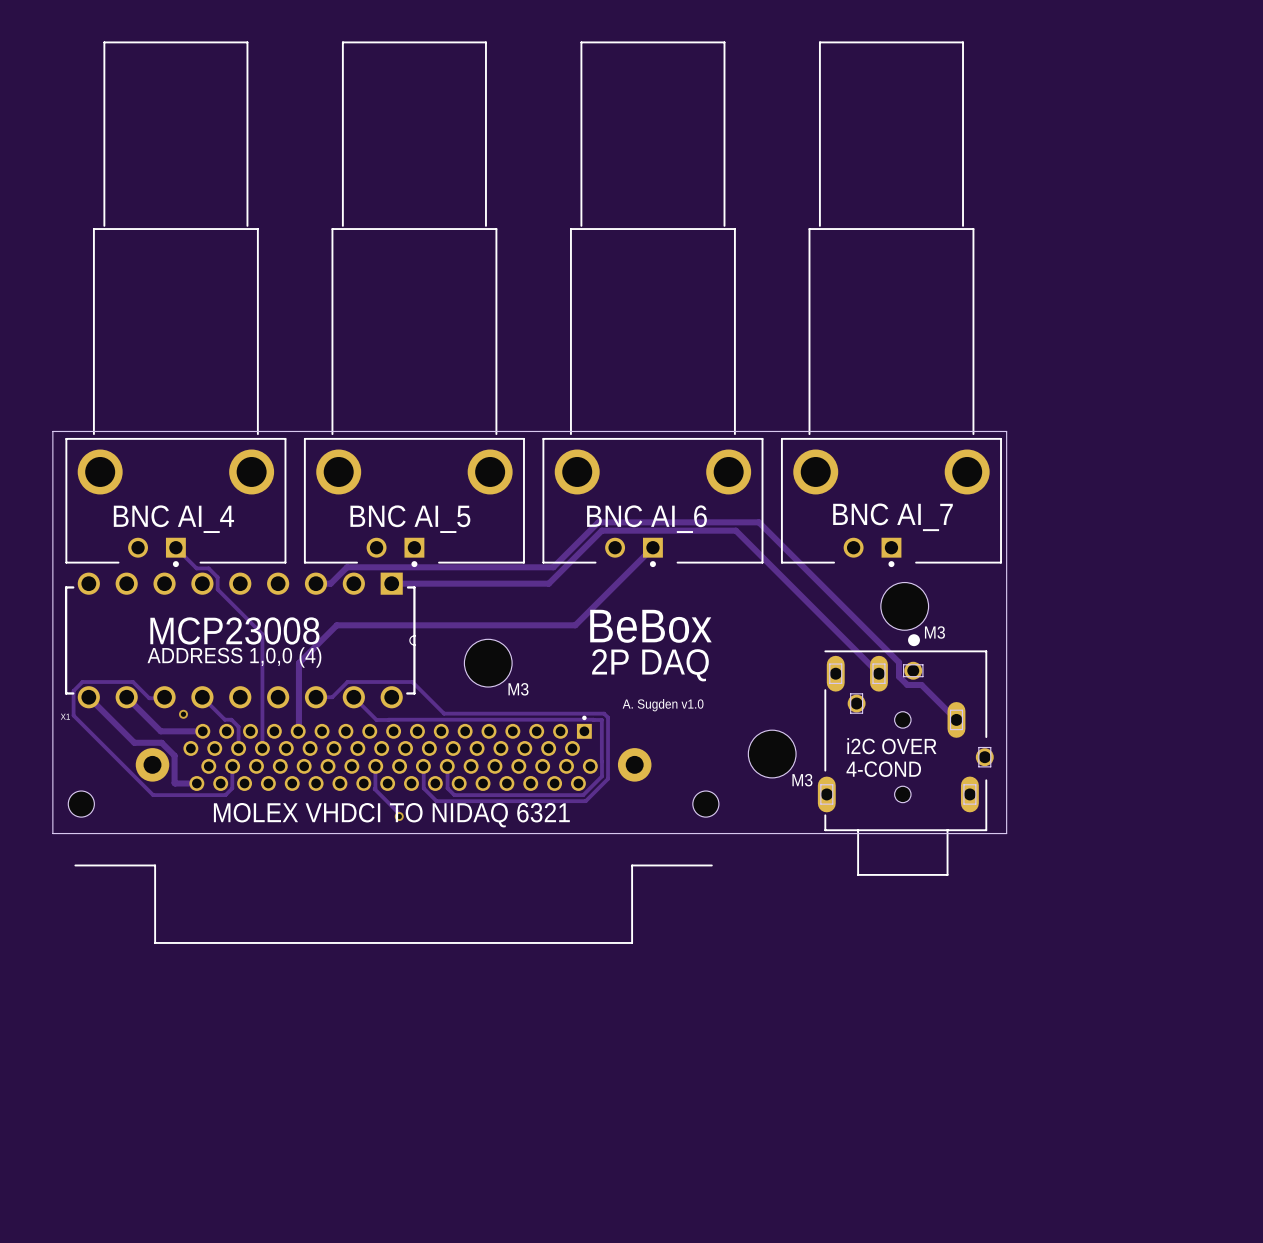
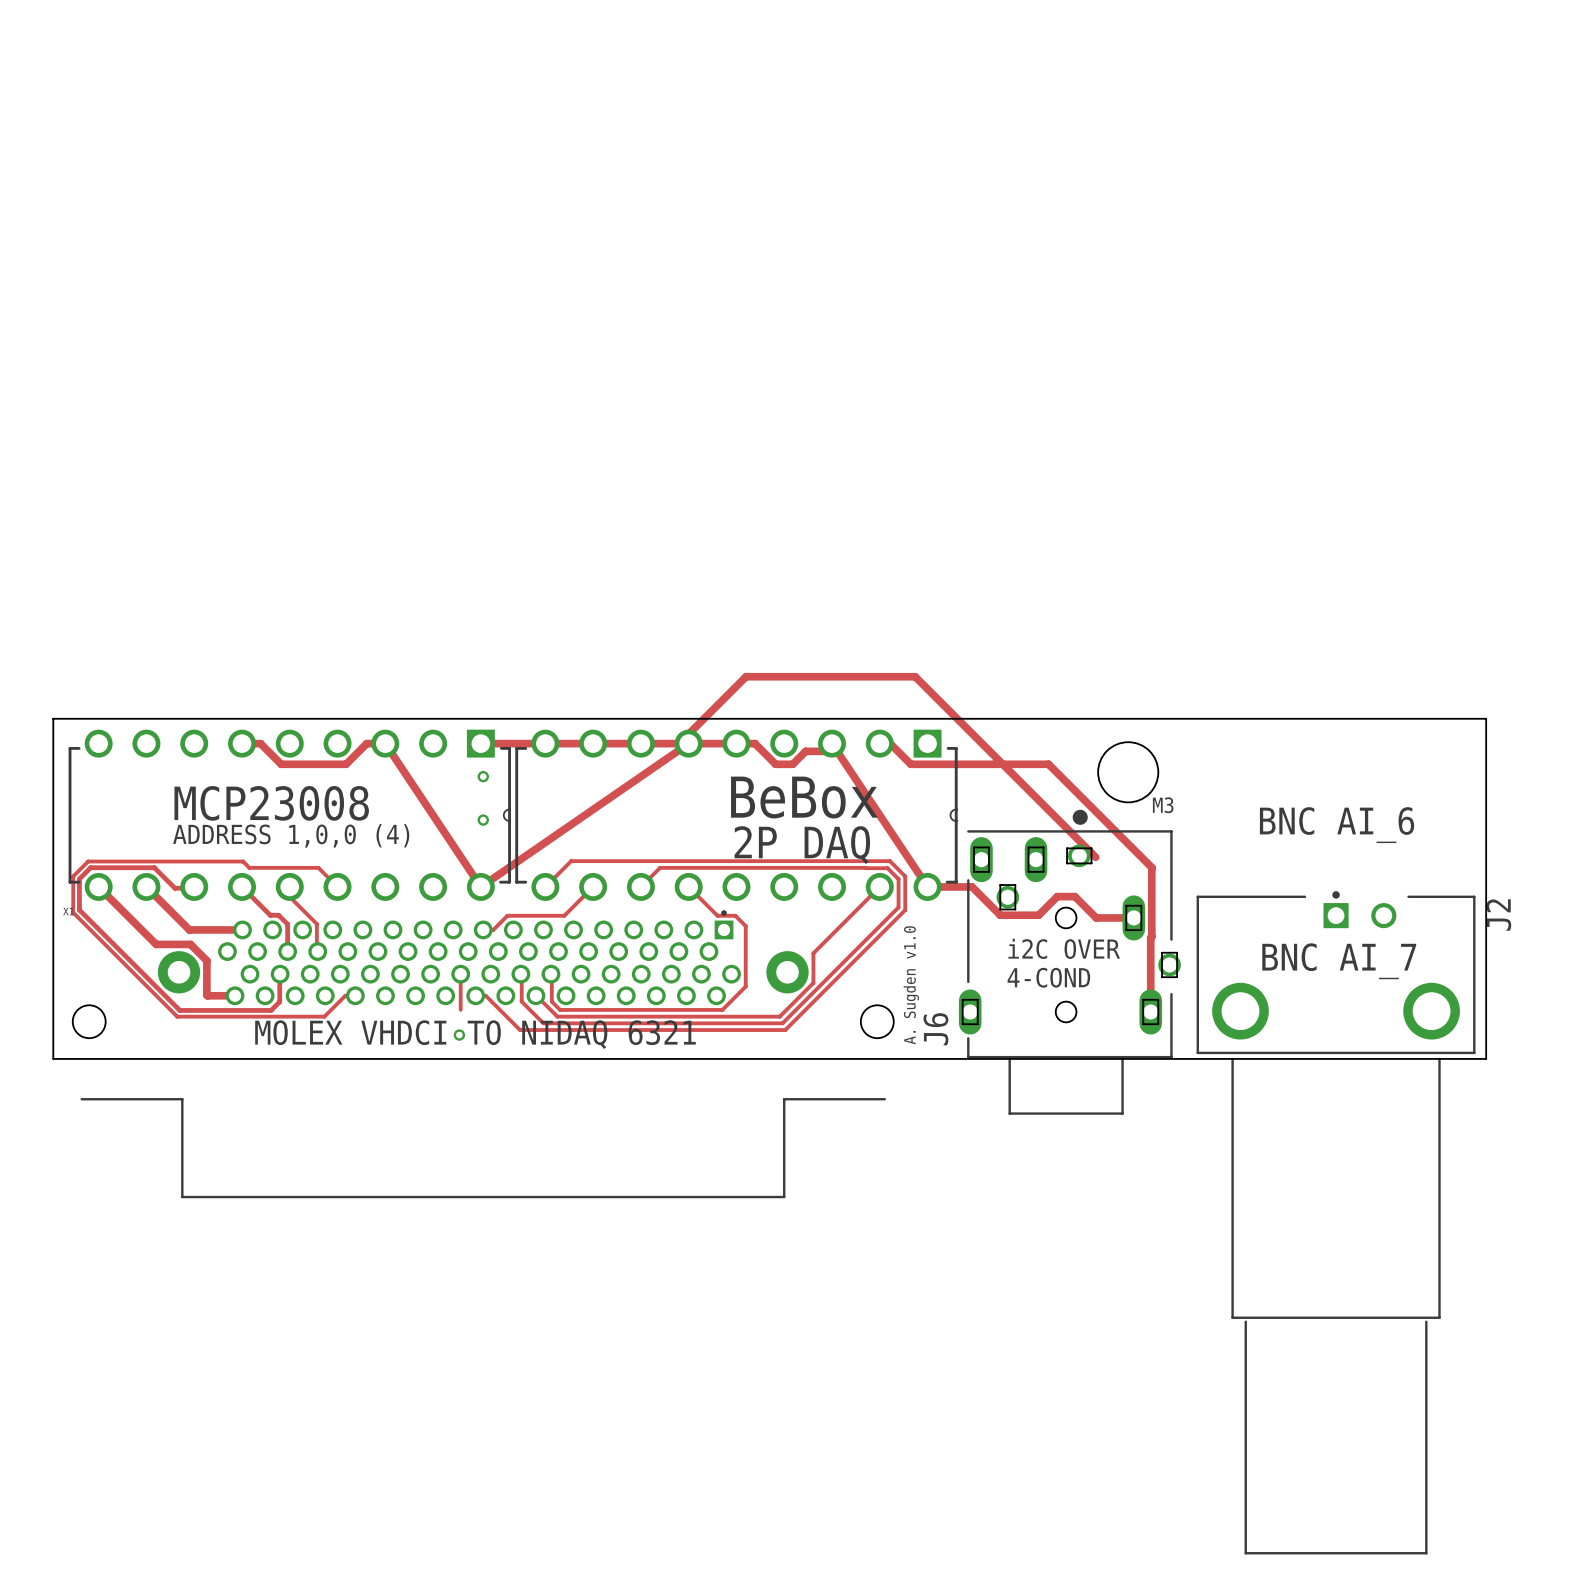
part: (175, 304) -> none
part: (414, 304) -> none
part: (652, 304) -> none
part: (891, 304) -> none
text position: BNC AI_7 (892, 517) -> BNC AI_7 (1339, 961)
text: BNC AI_4 (173, 519) -> none
text: BNC AI_5 (410, 519) -> none
text: BNC AI_6 (646, 519) -> none
track: (175, 547) (196, 568) (208, 568) (217, 577) (217, 589) (262, 634) (262, 748) -> (289, 886) (289, 896) (316, 924) (317, 951)
track: (652, 547) (575, 625) (336, 625) (298, 663) (298, 731) -> none
board edge: (52, 563) (52, 431) (1006, 431) (1006, 833) -> (53, 718) (1486, 718) (1486, 1058) (1256, 1058)
track: none -> (242, 743) (260, 743) (281, 764) (346, 764) (366, 743) (385, 743) (480, 886) (688, 743) (755, 743) (775, 764) (792, 764) (805, 751) (837, 751)
track: (315, 583) (330, 583) (347, 567) (553, 567) (598, 522) (758, 522) (899, 662) (899, 676) (907, 684) (921, 684) (956, 719) -> none
track: none -> (832, 743) (927, 886) (972, 886) (1000, 915) (1038, 915) (1057, 896) (1074, 896) (1096, 917) (1133, 917)
track: none -> (879, 743) (890, 743) (910, 764) (1048, 764) (1152, 867) (1150, 1011)
via: none -> (483, 776)
part: none -> (736, 815)
via: none -> (483, 820)
text: none -> BNC AI_6 (1337, 825)
hole: (488, 663) -> none
text: M3 (518, 689) -> none
track: none -> (337, 886) (318, 867) (249, 867) (243, 861) (88, 861) (73, 876) (73, 912) (177, 1016) (324, 1016) (345, 995) (355, 995)
track: (315, 697) (332, 697) (347, 682) (412, 682) (444, 713) (604, 713) (608, 717) (608, 778) (585, 801) (436, 801) (423, 788) (423, 766) -> (640, 886) (660, 867) (887, 868) (898, 879) (898, 907) (782, 1023) (543, 1023) (521, 1001) (520, 974)
track: (353, 697) (376, 719) (601, 719) (601, 761) -> none
track: none -> (545, 886) (571, 861) (889, 861) (905, 876) (905, 910) (785, 1030) (520, 1030) (485, 995) (475, 995)
track: none -> (593, 886) (564, 915) (507, 915) (493, 929) (483, 929)
track: none -> (879, 886) (813, 953) (813, 983) (779, 1016) (557, 1016) (535, 995)
text rotation: 0° (663, 705) -> 90° counterclockwise (911, 985)
via: (183, 714) -> none
text position: i2C OVER (891, 746) -> i2C OVER (1064, 948)
hole: (772, 754) -> none
part: (905, 755) -> none
J6: none -> (1069, 962)
track: (601, 761) (601, 776) (583, 795) (454, 795) (447, 788) (447, 766) -> (688, 886) (717, 915) (735, 915) (745, 926) (745, 986) (722, 1009) (560, 1009) (551, 1001) (550, 974)
track: (375, 766) (374, 789) (399, 813) (399, 816) -> (460, 974) (460, 1009)
text position: 4-COND (883, 769) -> 4-COND (1048, 977)
text: M3 (802, 780) -> none
via position: (399, 816) -> (459, 1035)
J2: none -> (1336, 1222)

